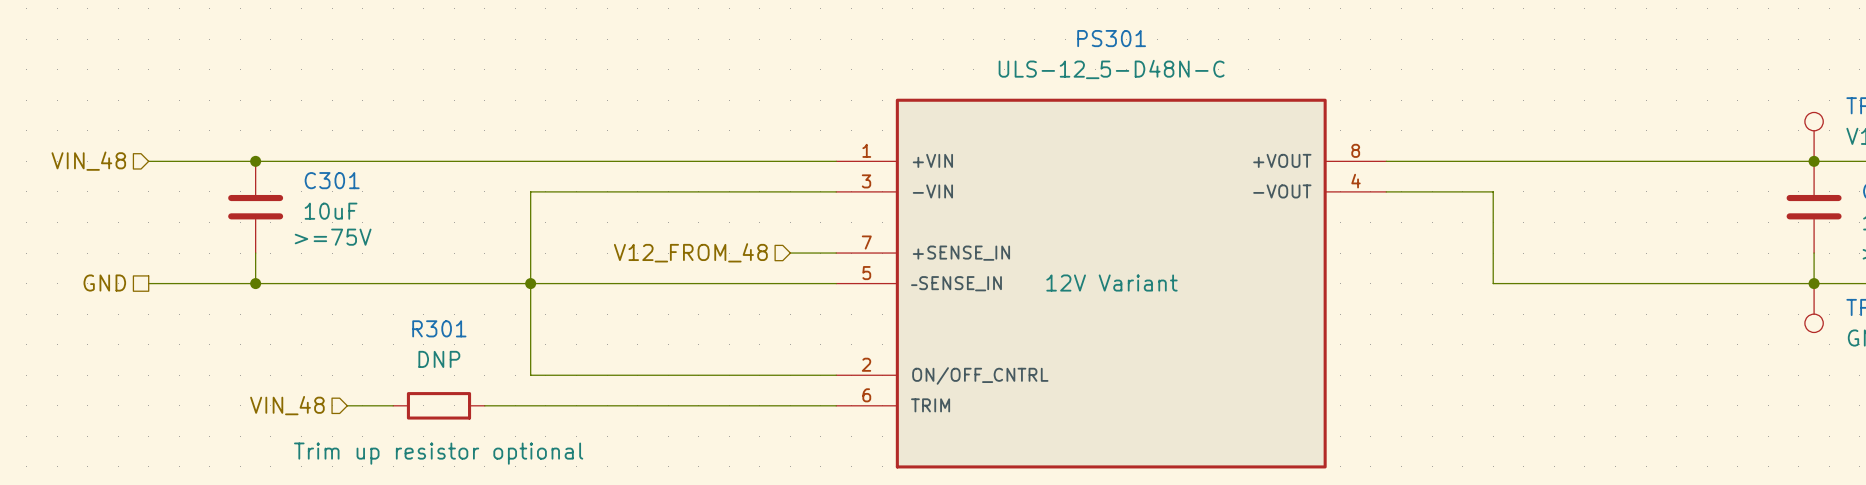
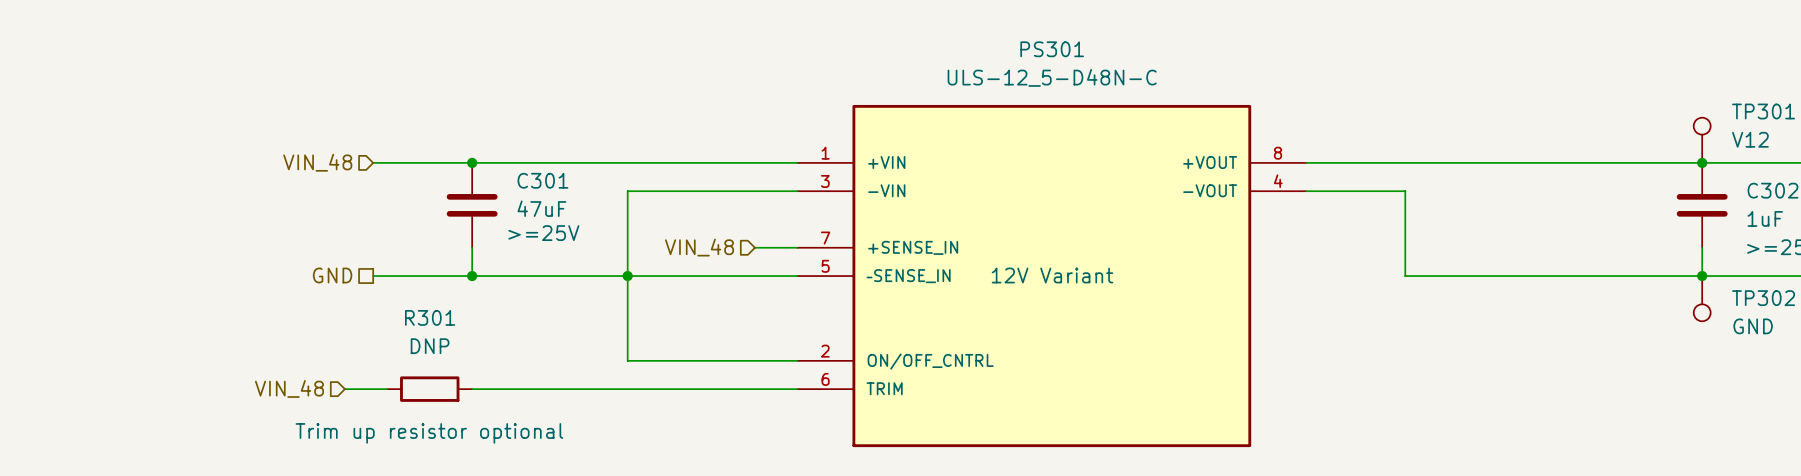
hierarchical label position: VIN_48 (88, 161) -> VIN_48 (317, 162)
wire: (148, 161) (377, 161) -> none
junction: (255, 161) -> none
junction: none -> (472, 162)
wire: (652, 191) (530, 191) (530, 375) (652, 375) -> (627, 191) (627, 360)
C301 position: (255, 207) -> (472, 205)
C301 value: 10uF (331, 211) -> 47uF (541, 208)
C301 text: >=75V (333, 237) -> >=25V (543, 233)
hierarchical label: V12_FROM_48 (690, 252) -> VIN_48 (699, 247)
wire: (255, 253) (255, 283) -> (472, 247) (472, 276)
hierarchical label position: GND (104, 283) -> GND (332, 275)
wire: (148, 283) (377, 283) -> none
junction: (255, 283) -> none
junction position: (530, 283) -> (472, 276)
junction: none -> (627, 276)

